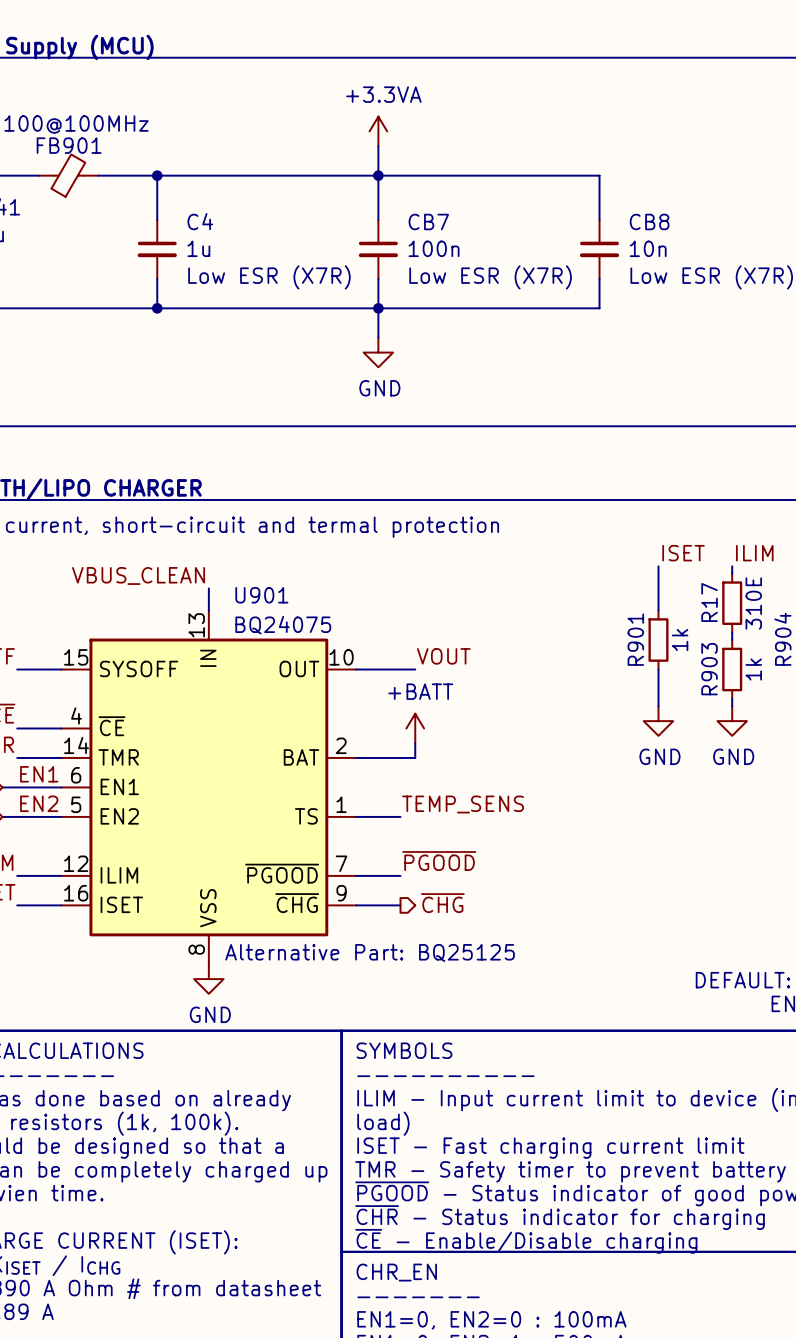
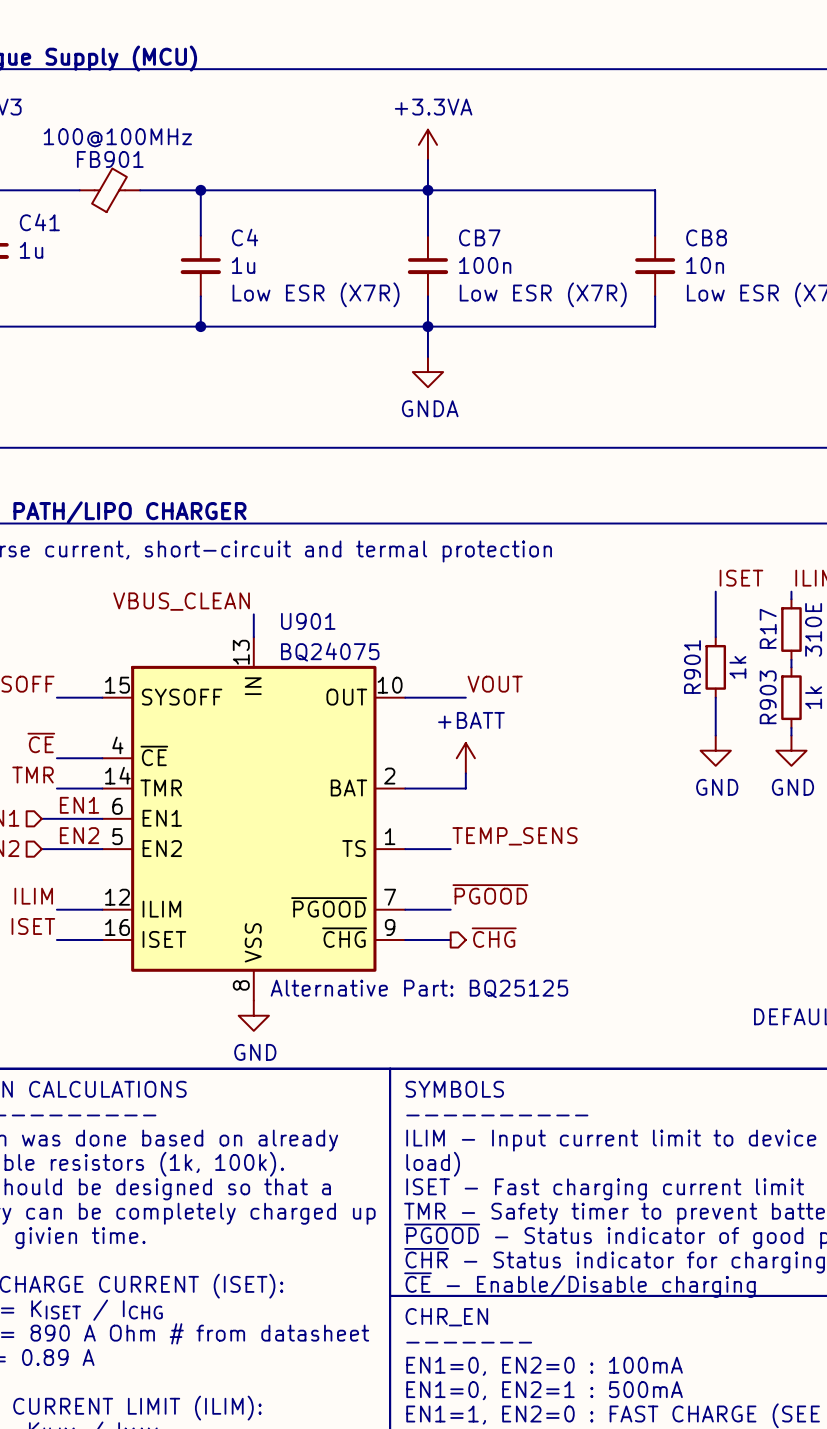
power symbol: GND (378, 352) -> GNDA (427, 372)

